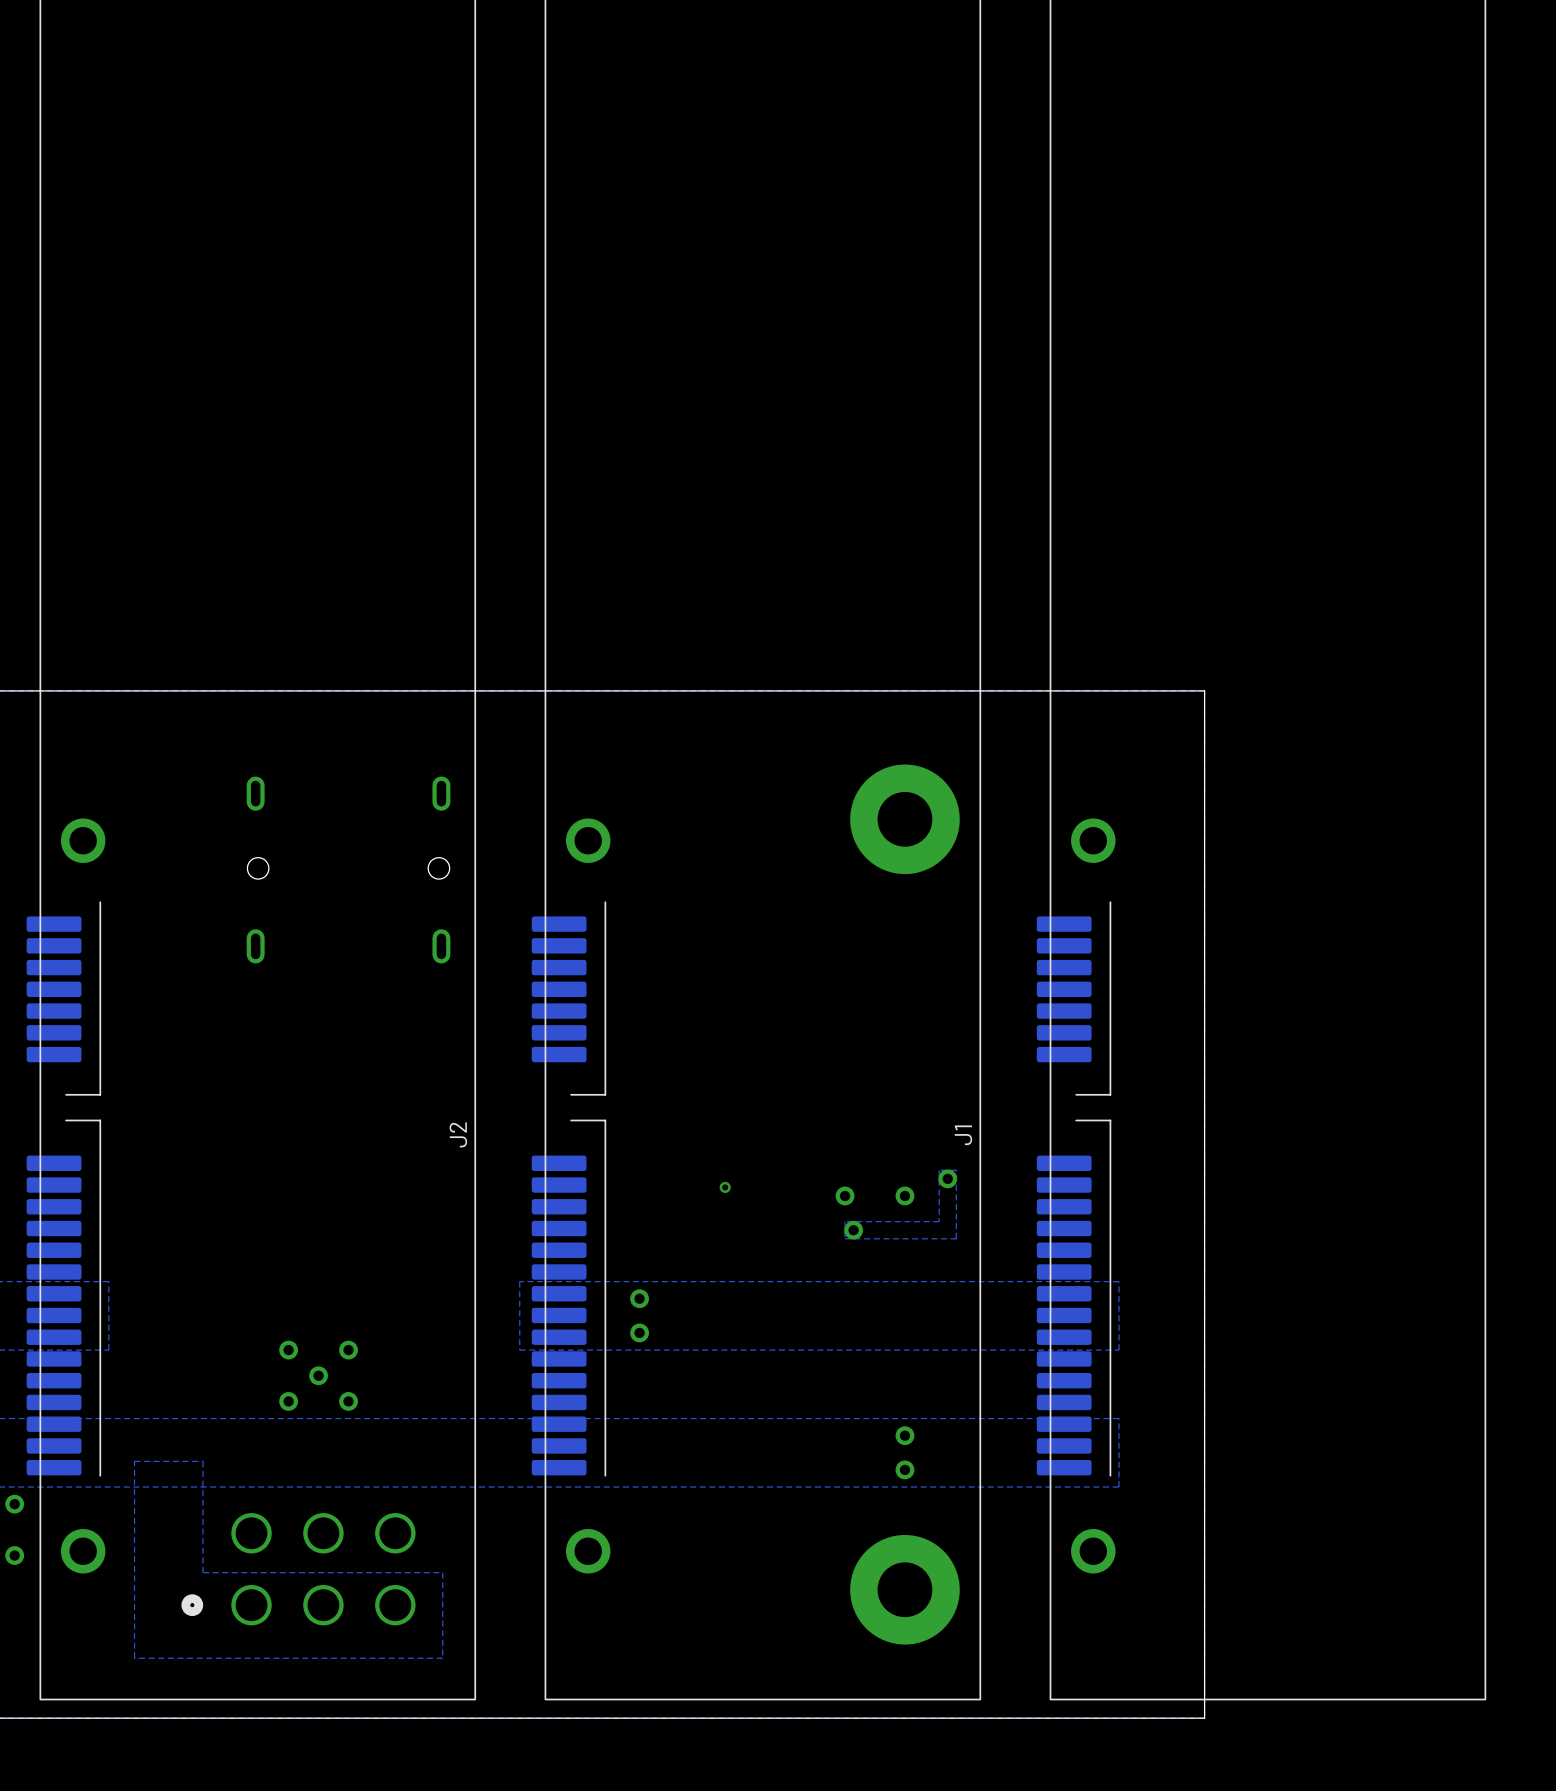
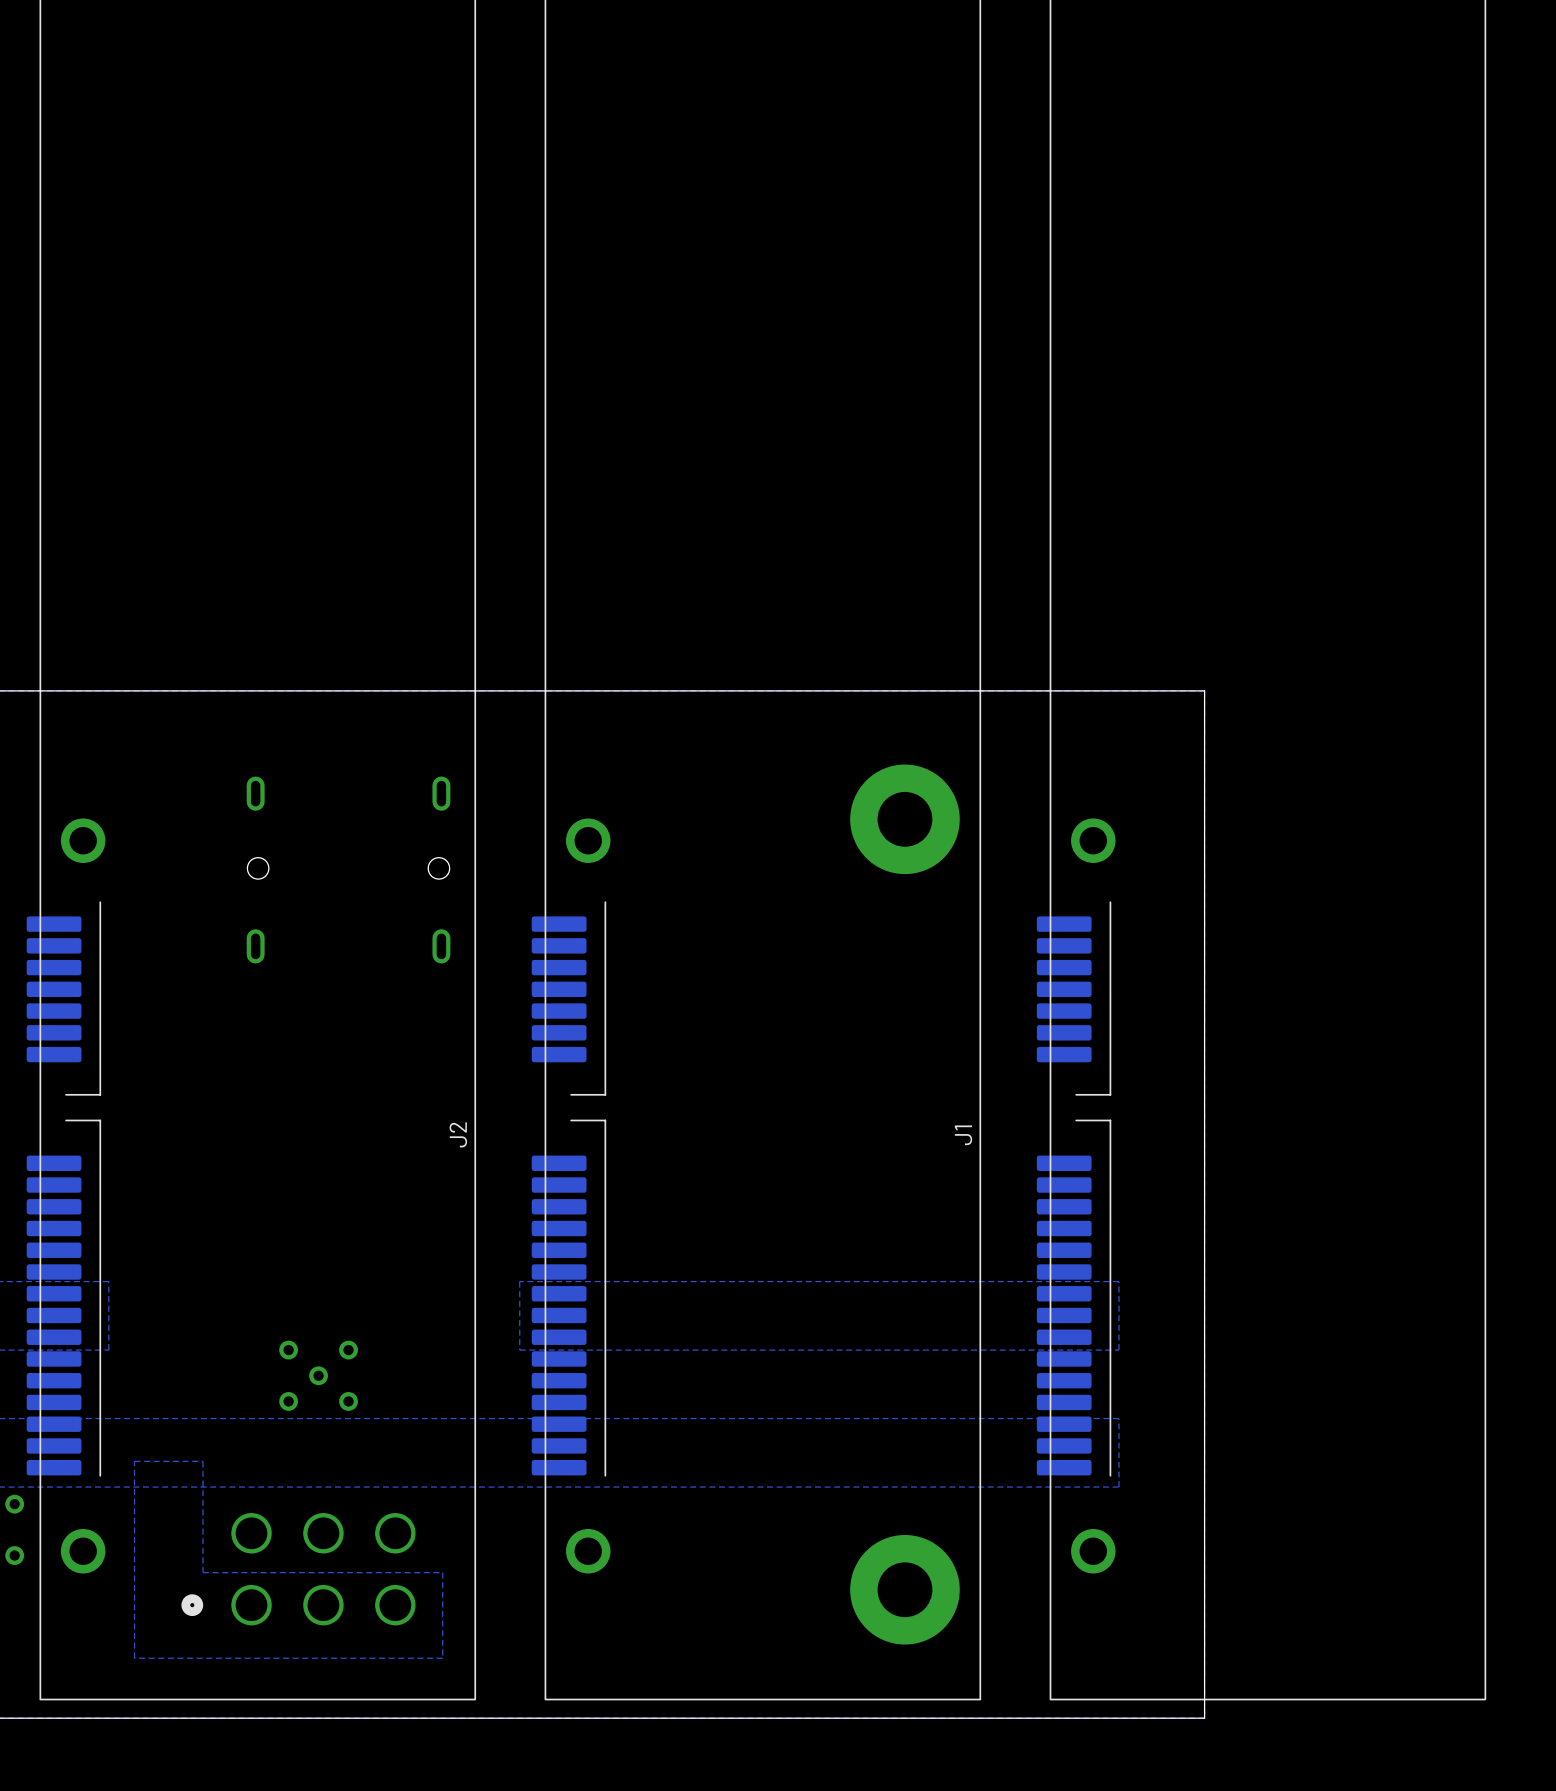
zone outline: (956, 1170) (956, 1238) (845, 1238) (845, 1221) (939, 1221) (939, 1170) (956, 1170) -> none
via: (947, 1178) -> none
via: (725, 1187) -> none
via: (845, 1195) -> none
via: (904, 1195) -> none
via: (853, 1230) -> none
via: (639, 1298) -> none
via: (639, 1332) -> none
via: (904, 1435) -> none
via: (904, 1469) -> none

